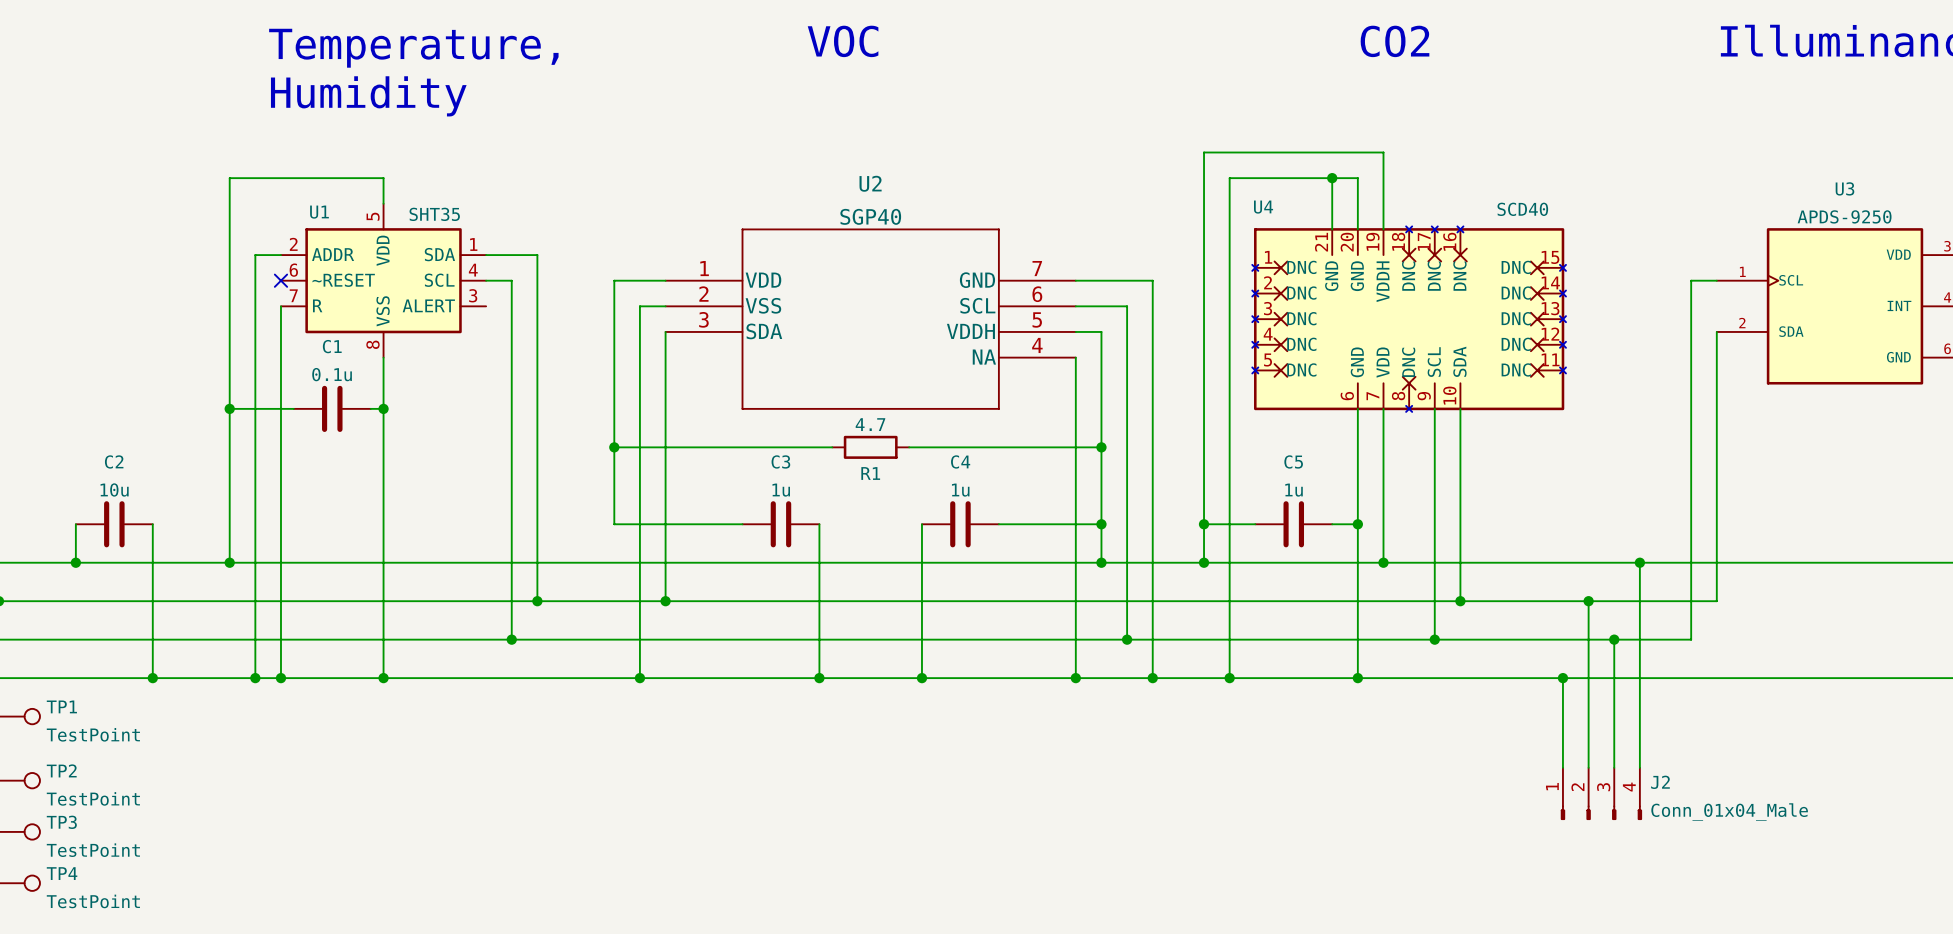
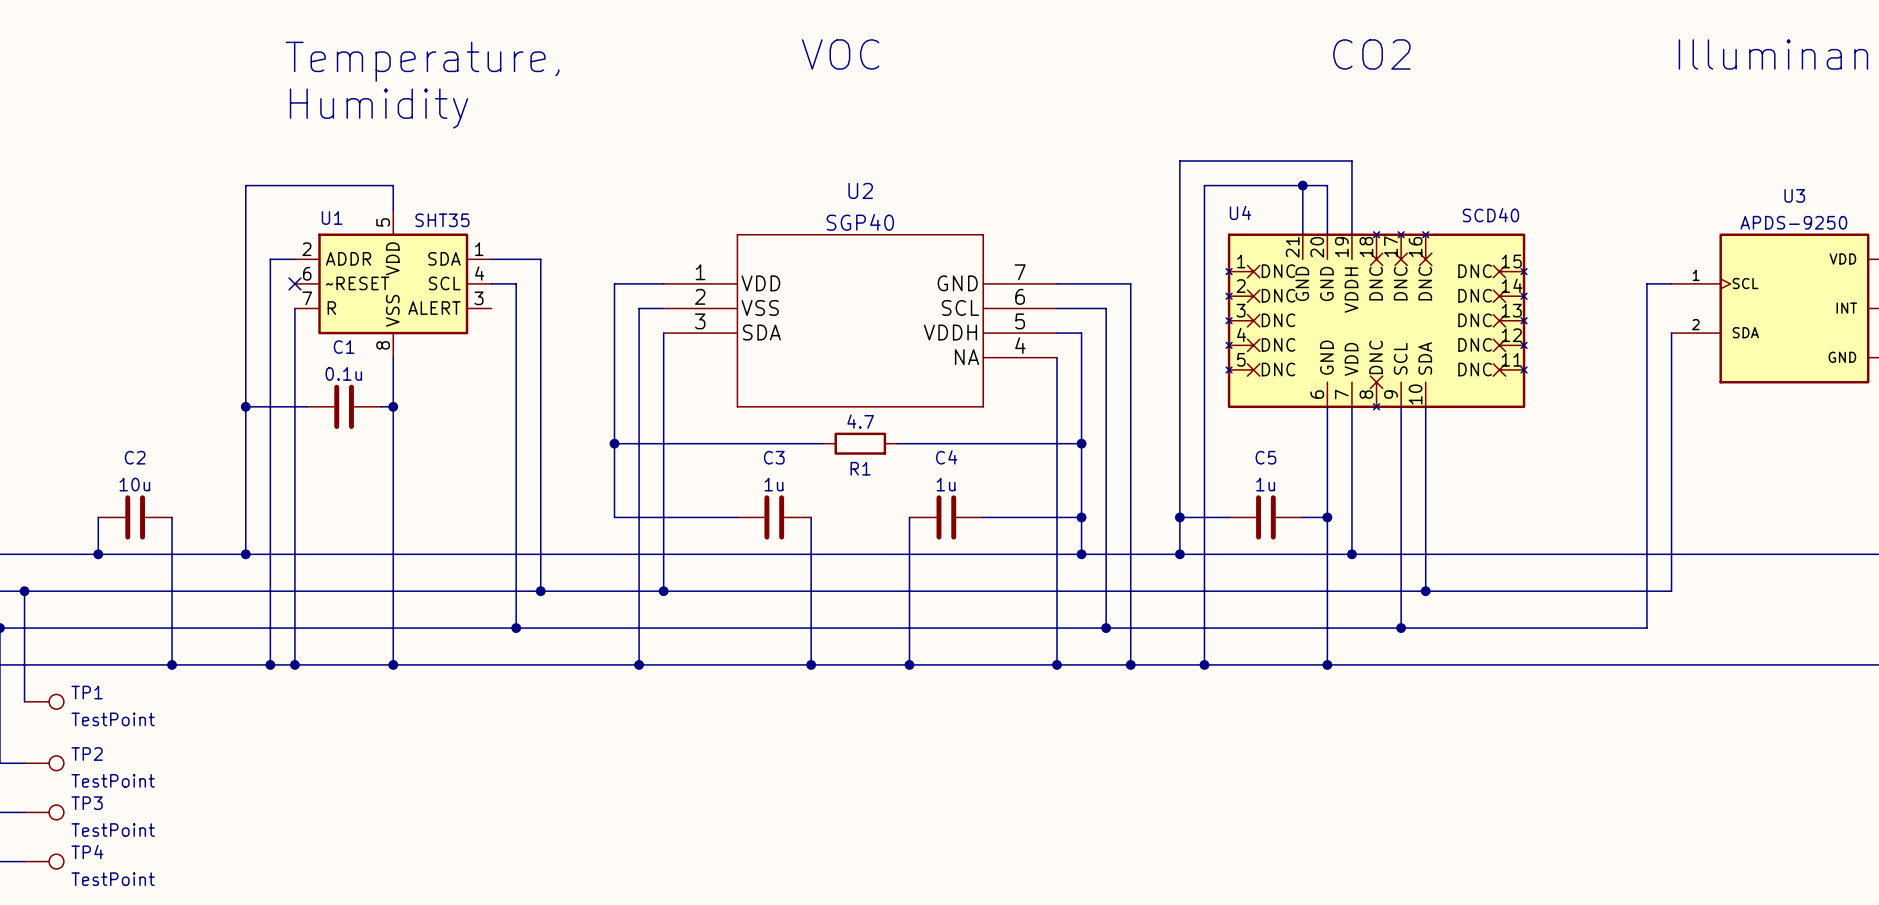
wire: (1639, 562) (1639, 767) -> none
junction: (1639, 562) -> none
wire: (1588, 601) (1588, 767) -> none
junction: (1588, 601) -> none
wire: (1614, 639) (1614, 767) -> none
junction: (1614, 639) -> none
wire: (1562, 678) (1562, 767) -> none
junction: (1562, 678) -> none
J2: Conn_01x04_Male (1601, 793) -> none

